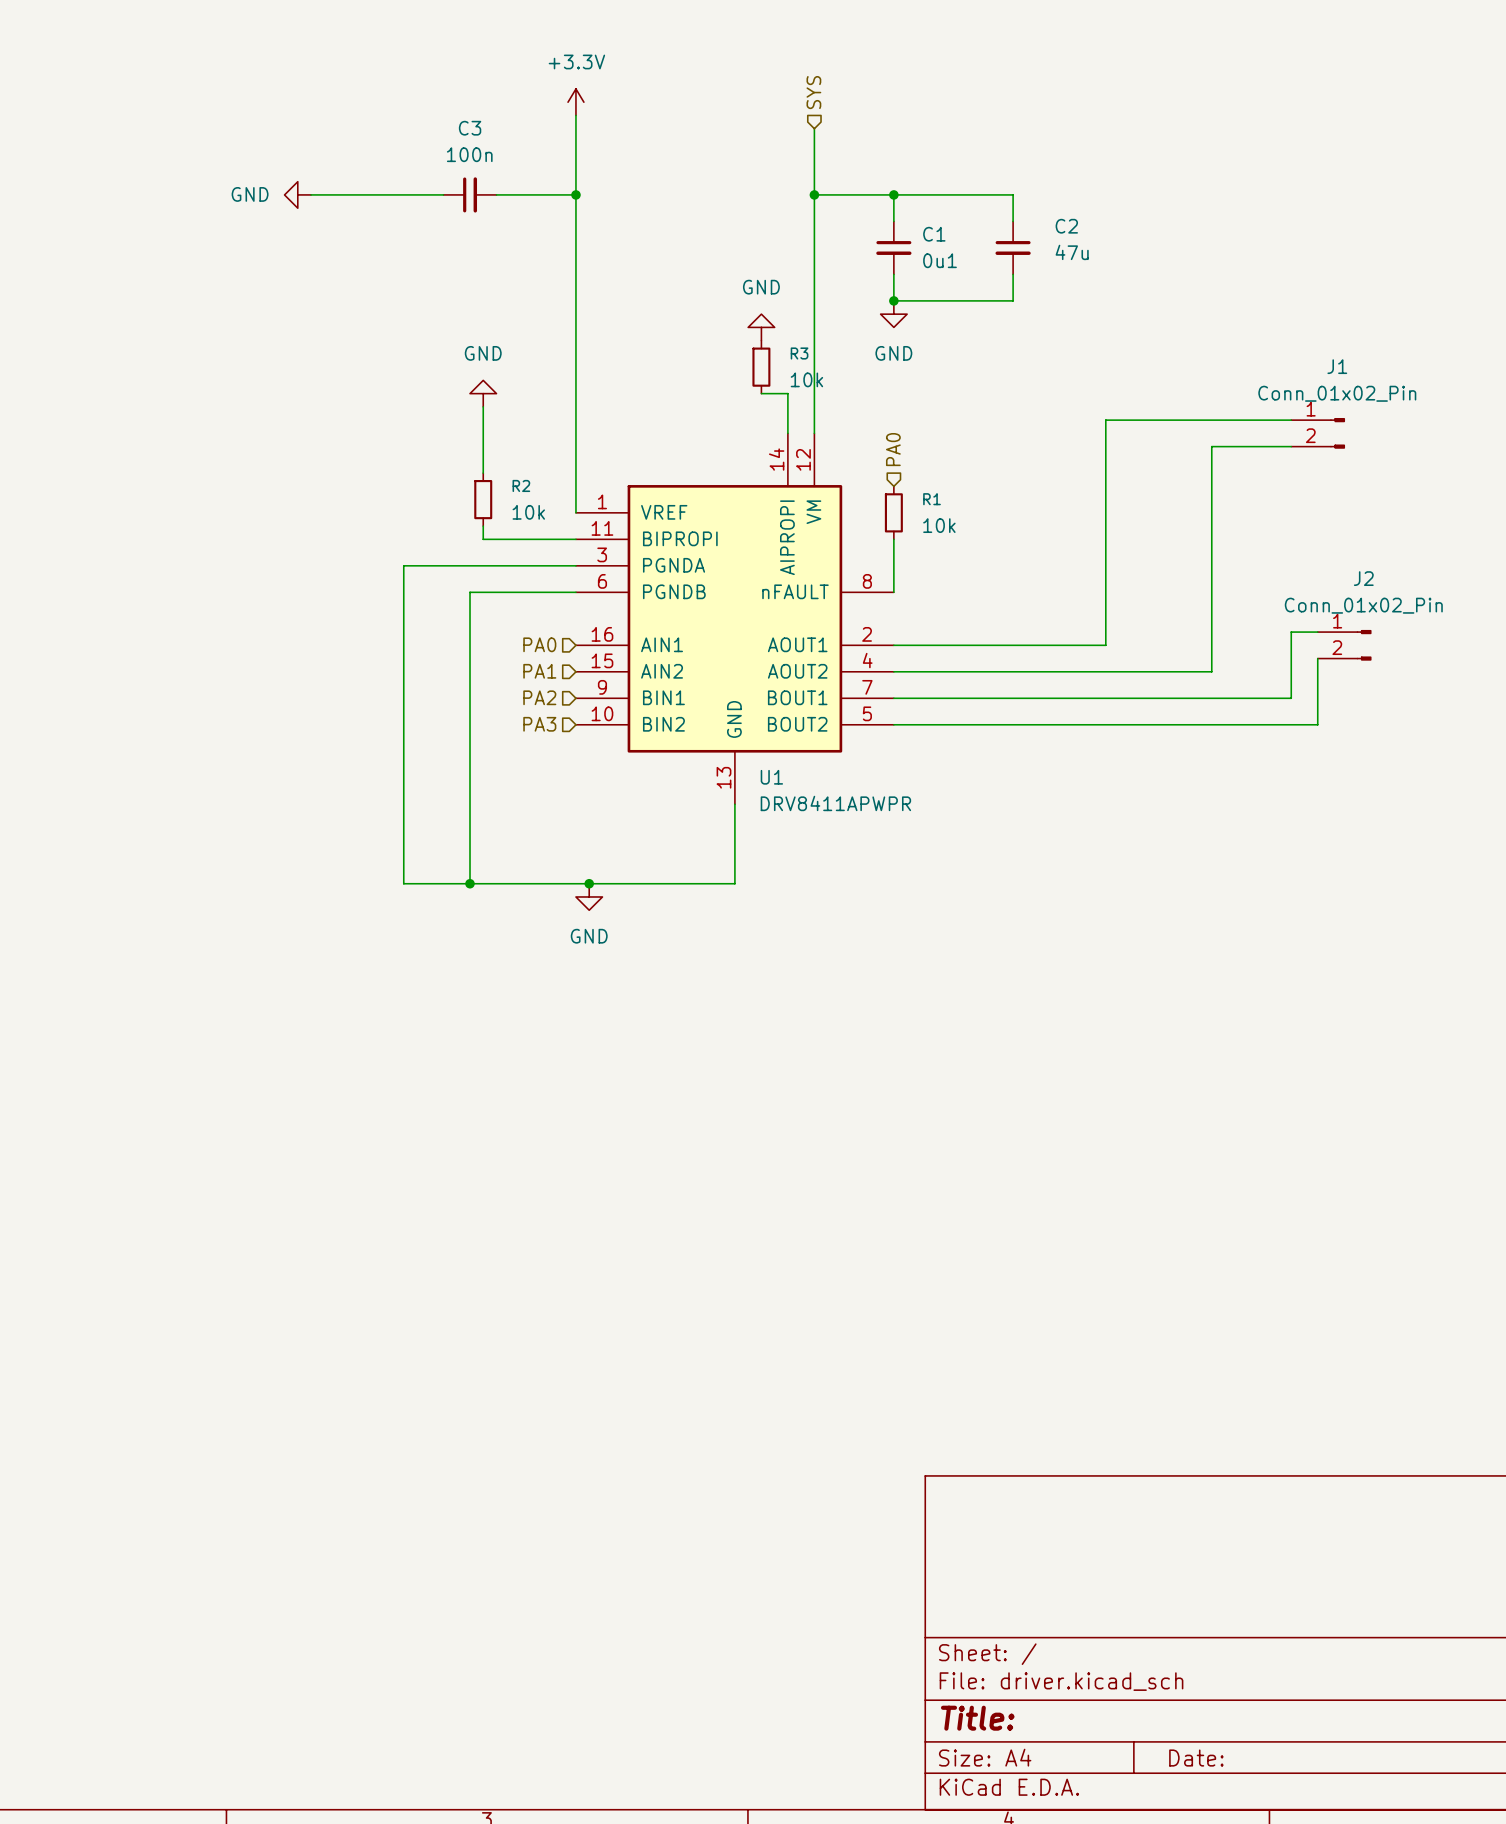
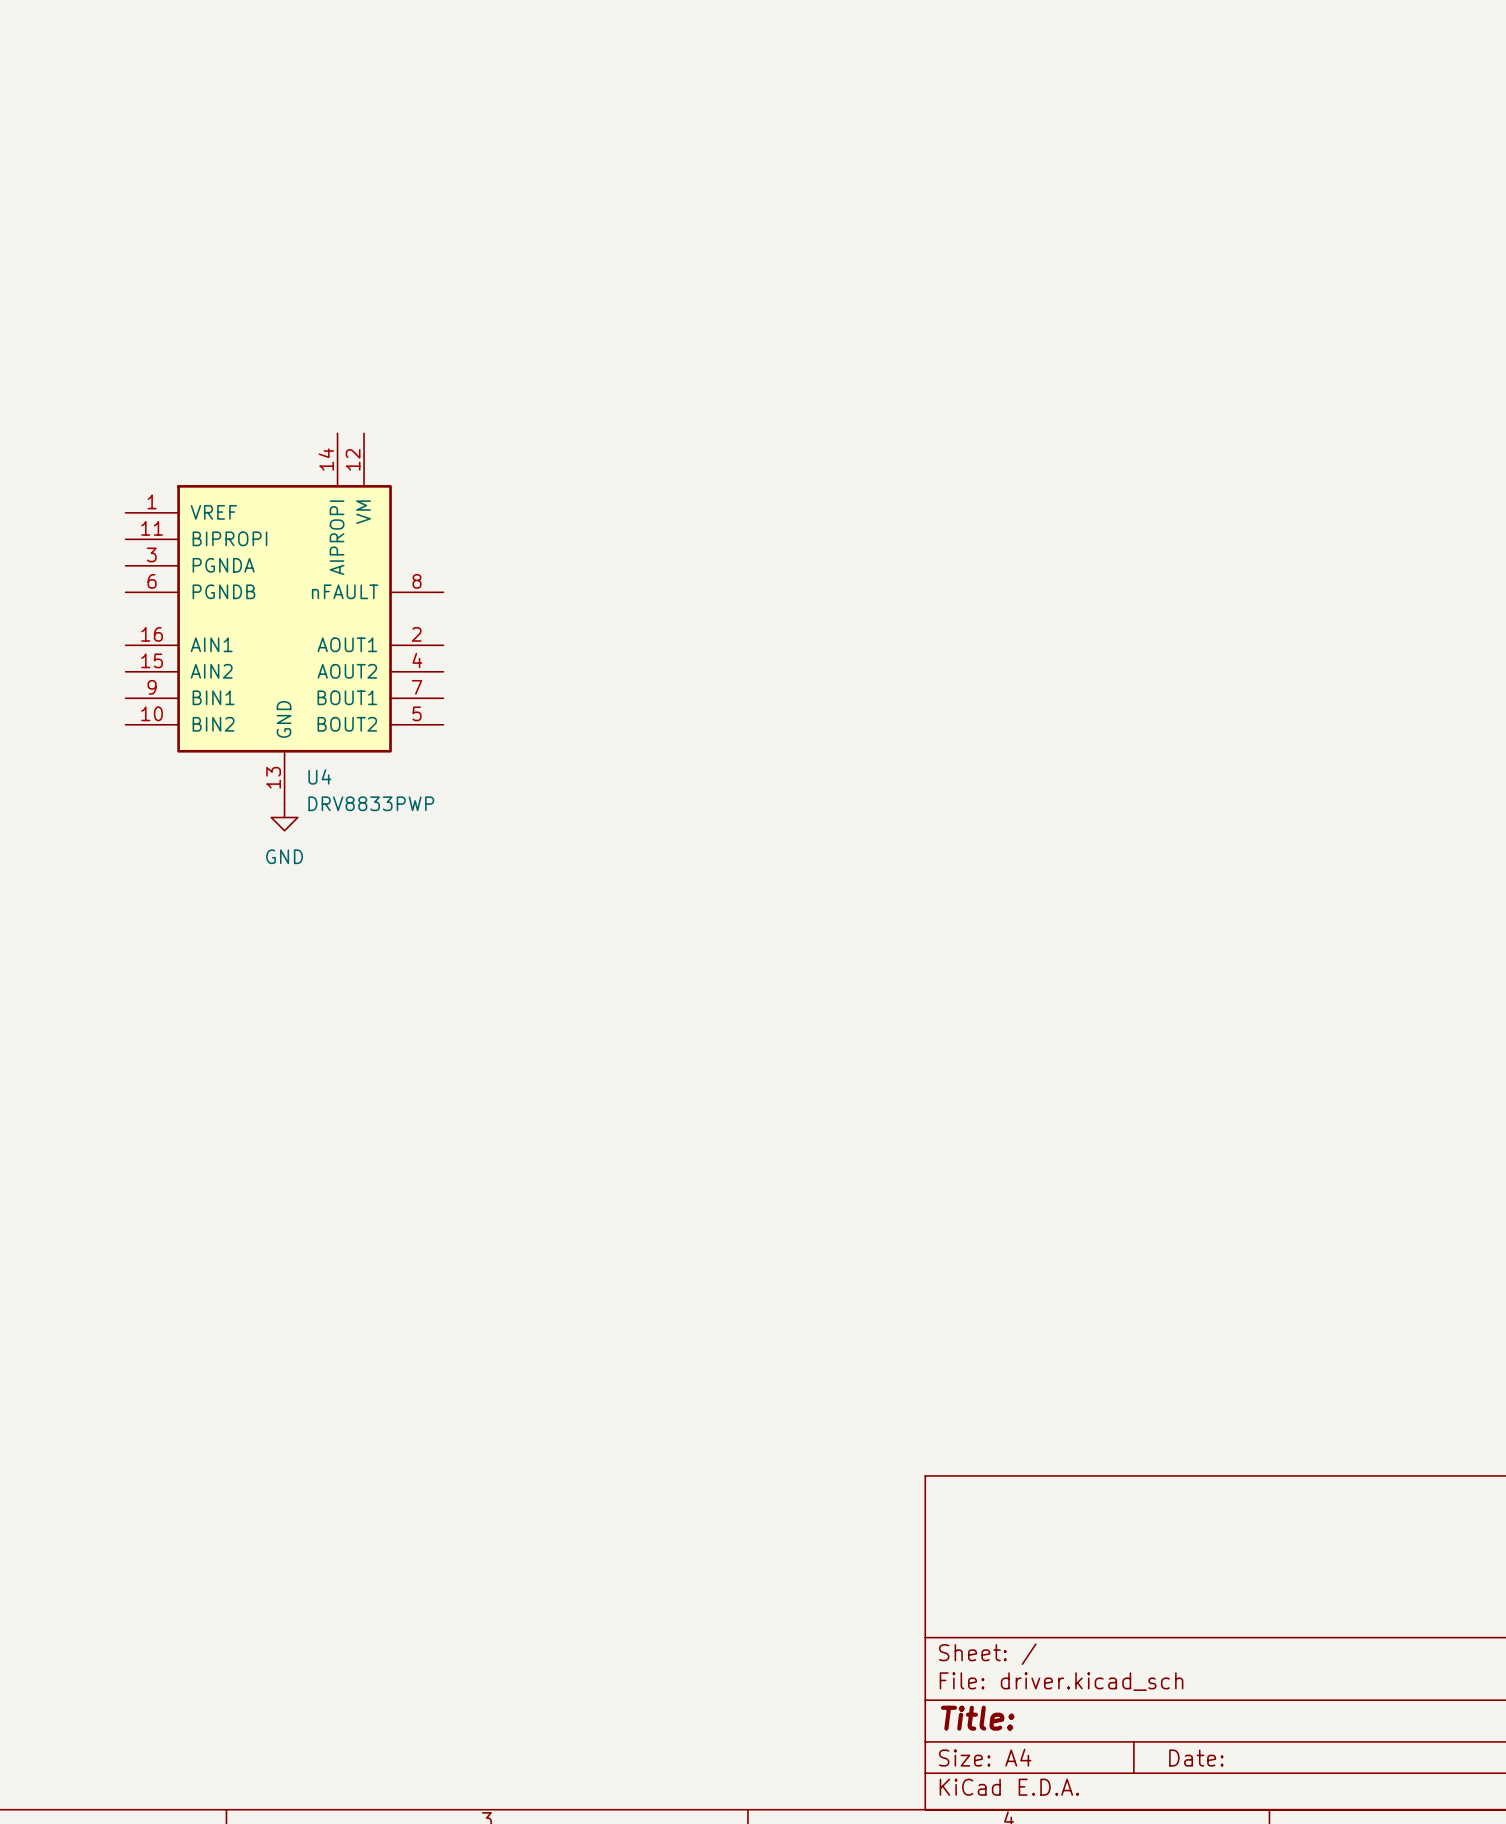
hierarchical label: SYS (813, 92) -> none
power symbol: +3.3V (575, 102) -> none
wire: (575, 115) (575, 512) -> none
wire: (814, 128) (814, 433) -> none
power symbol: GND (297, 194) -> none
wire: (311, 194) (443, 194) -> none
C3: 100n (470, 194) -> none
wire: (496, 194) (575, 194) -> none
junction: (575, 194) -> none
wire: (814, 194) (1013, 194) (1013, 221) -> none
junction: (814, 194) -> none
wire: (893, 194) (893, 221) -> none
junction: (893, 194) -> none
C1: 0u1 (893, 247) -> none
C2: 47u (1013, 247) -> none
wire: (893, 274) (893, 300) (1013, 300) (1013, 274) -> none
junction: (893, 300) -> none
power symbol: GND (893, 314) -> none
power symbol: GND (761, 327) -> none
R3: 10k (761, 367) -> none
power symbol: GND (483, 393) -> none
wire: (761, 393) (787, 393) (787, 433) -> none
wire: (483, 406) (483, 473) -> none
wire: (1291, 420) (1105, 420) (1105, 645) (893, 645) -> none
J1: Conn_01x02_Pin (1318, 433) -> none
wire: (1291, 446) (1211, 446) (1211, 671) (893, 671) -> none
hierarchical label: PA0 (893, 449) -> none
R2: 10k (483, 499) -> none
R1: 10k (893, 512) -> none
wire: (483, 526) (483, 539) (575, 539) -> none
wire: (893, 539) (893, 592) -> none
wire: (575, 565) (403, 565) (403, 883) (734, 883) (734, 804) -> none
wire: (575, 592) (470, 592) (470, 883) -> none
U4: none -> DRV8833PWP (284, 618)
U1: DRV8411APWPR (734, 618) -> none
wire: (1317, 632) (1291, 632) (1291, 698) (893, 698) -> none
hierarchical label: PA0 (539, 644) -> none
J2: Conn_01x02_Pin (1344, 645) -> none
wire: (1317, 658) (1317, 724) (893, 724) -> none
hierarchical label: PA1 (539, 671) -> none
hierarchical label: PA2 (539, 697) -> none
hierarchical label: PA3 (539, 724) -> none
power symbol: none -> GND (284, 817)
junction: (470, 883) -> none
junction: (589, 883) -> none
power symbol: GND (589, 896) -> none

